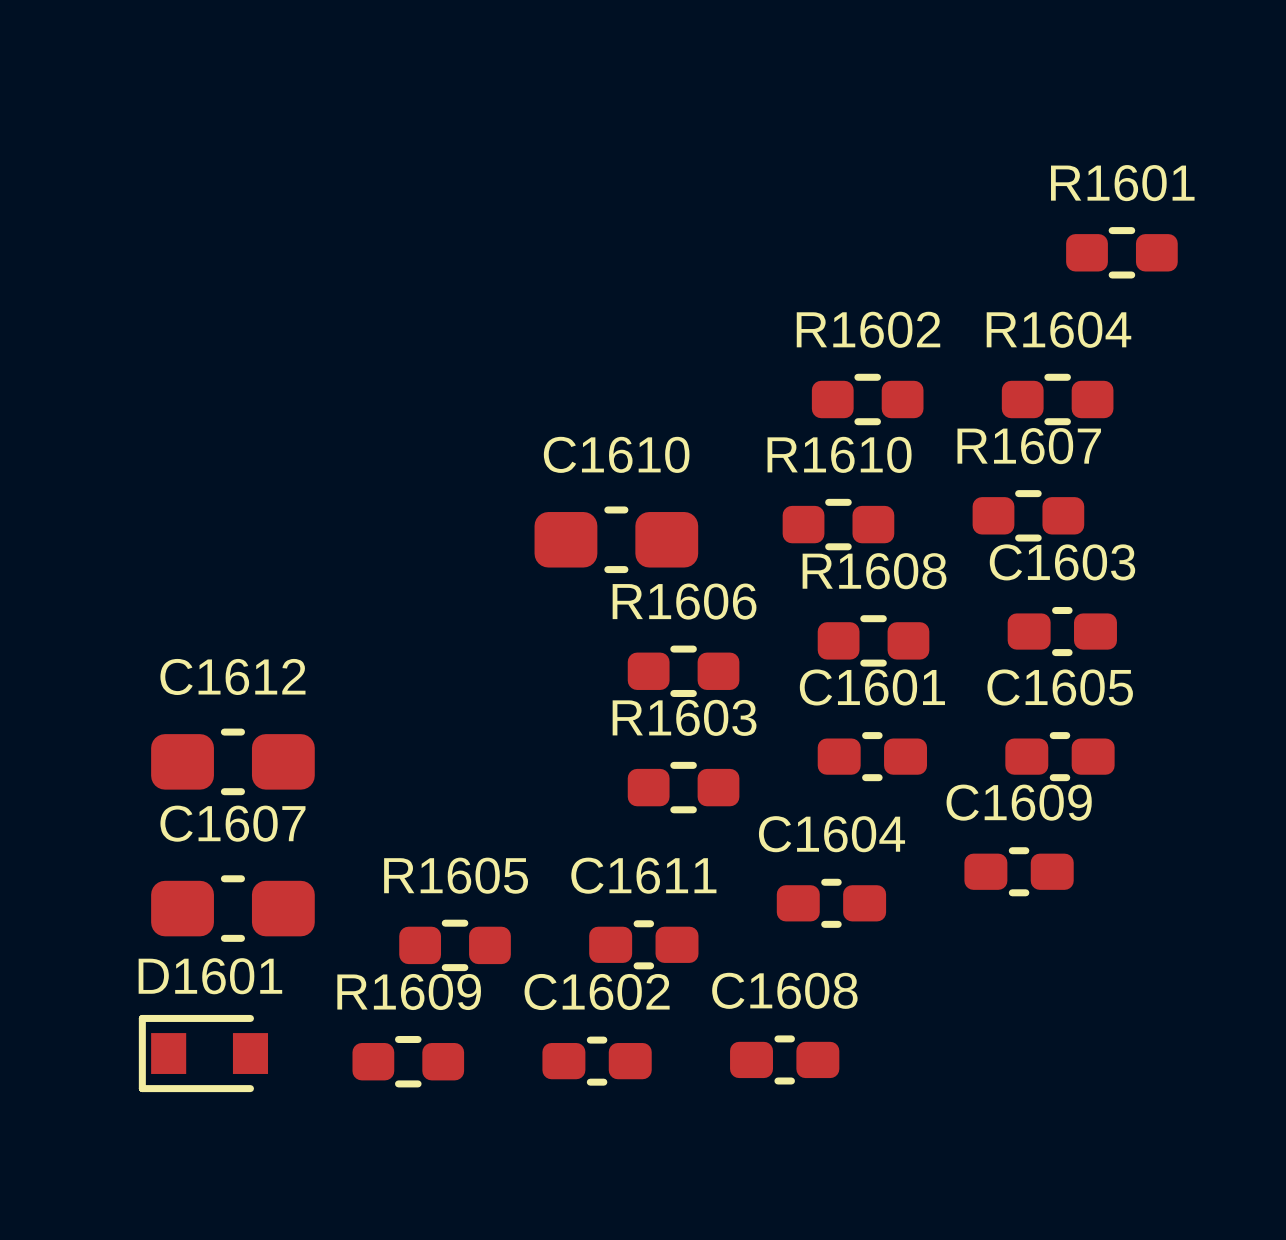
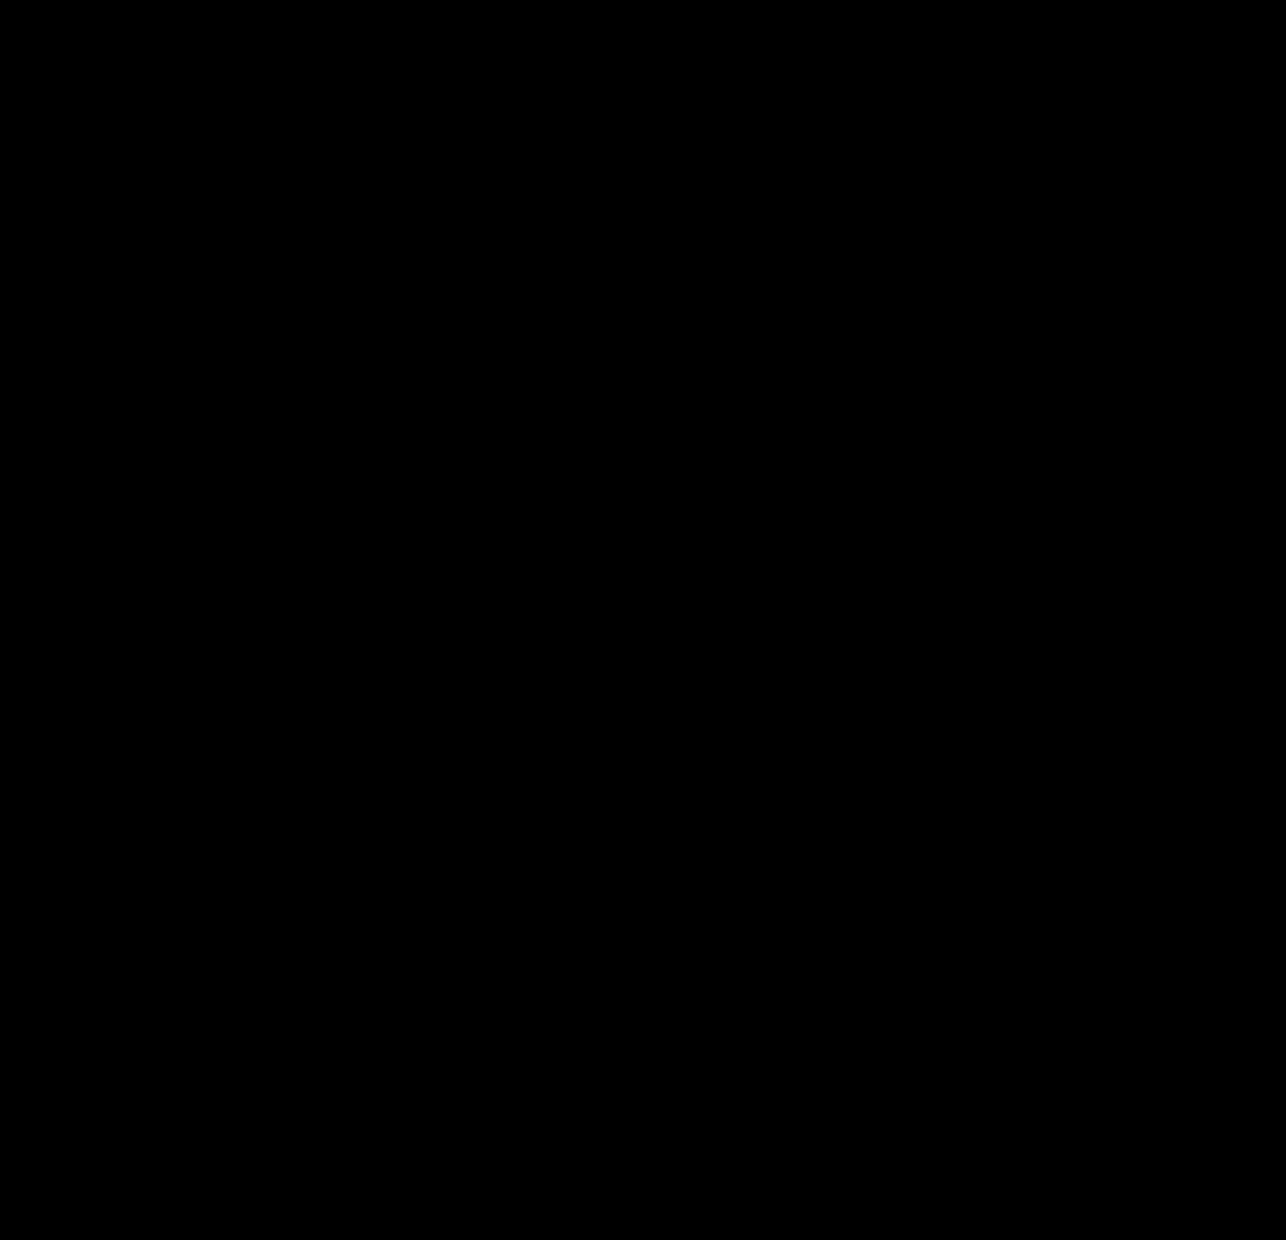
R1601: (1121, 252) -> none
R1602: (867, 399) -> none
R1604: (1057, 399) -> none
R1607: (1028, 515) -> none
R1610: (838, 524) -> none
C1610: (616, 539) -> none
C1603: (1062, 631) -> none
R1608: (873, 640) -> none
R1606: (683, 671) -> none
C1601: (872, 756) -> none
C1605: (1059, 756) -> none
C1612: (232, 761) -> none
R1603: (683, 787) -> none
C1609: (1019, 871) -> none
C1604: (831, 903) -> none
C1607: (232, 908) -> none
C1611: (643, 944) -> none
R1605: (455, 945) -> none
D1601: (203, 1053) -> none
C1608: (784, 1059) -> none
R1609: (408, 1061) -> none
C1602: (597, 1061) -> none

